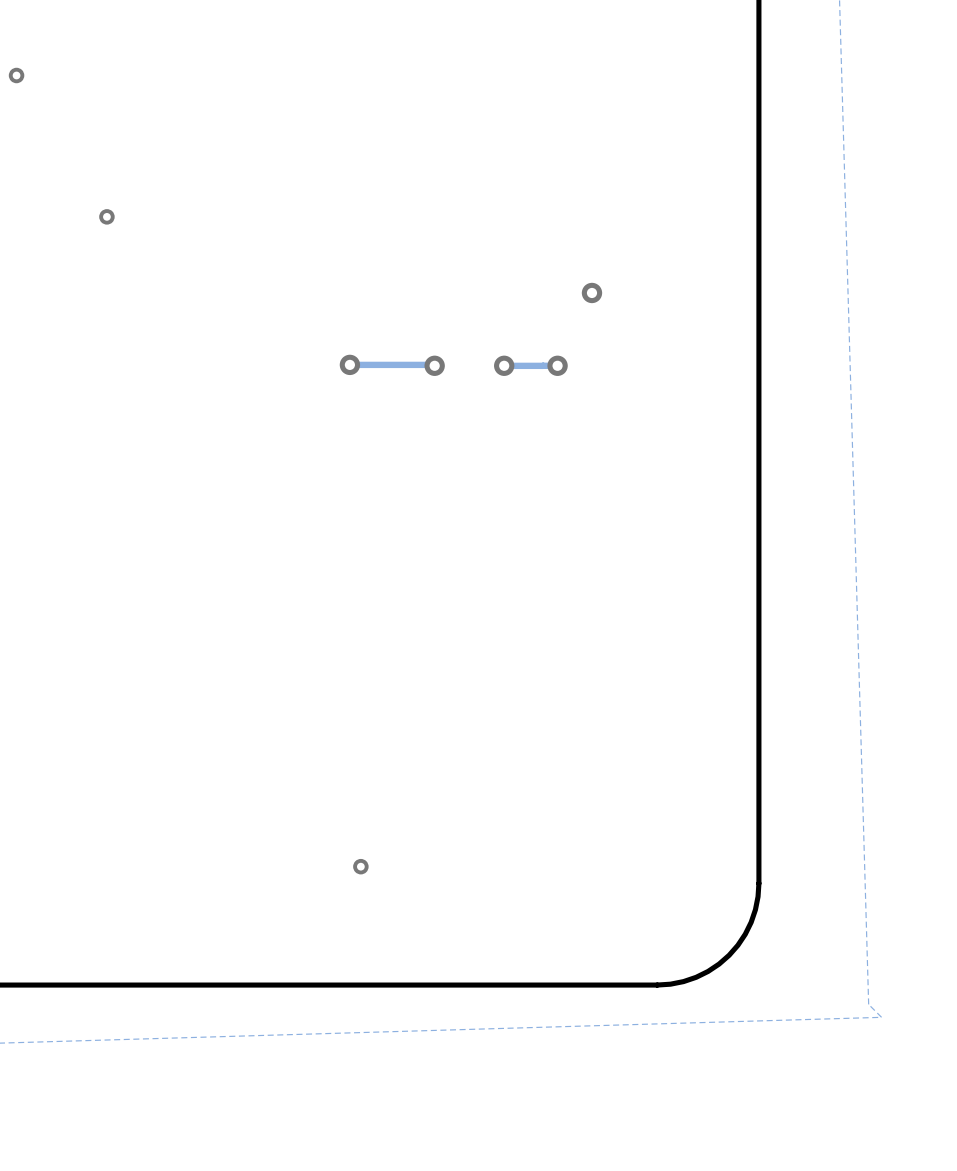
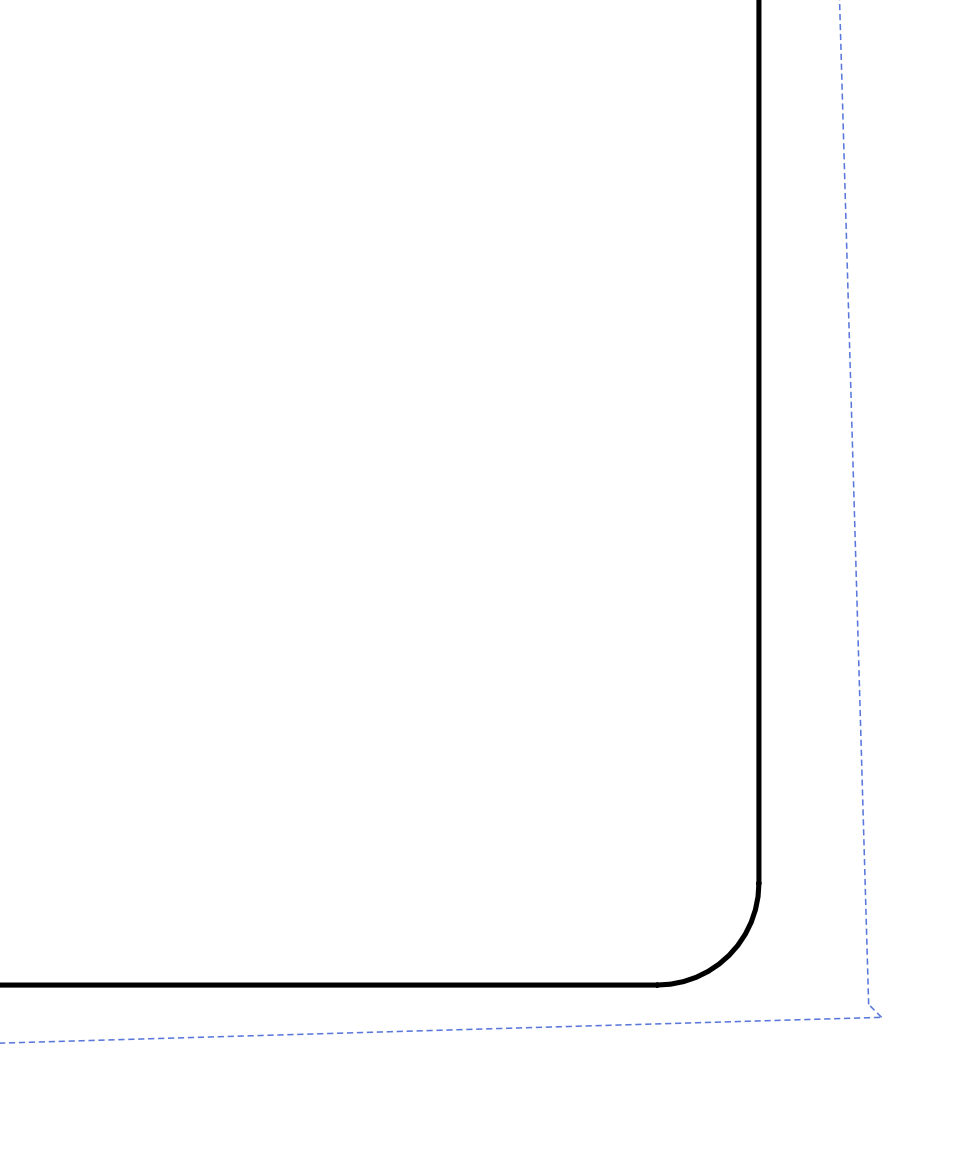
via: (16, 75) -> none
via: (106, 216) -> none
via: (591, 292) -> none
track: (349, 364) (434, 365) -> none
via: (349, 364) -> none
via: (434, 365) -> none
via: (504, 365) -> none
via: (557, 365) -> none
via: (360, 866) -> none

